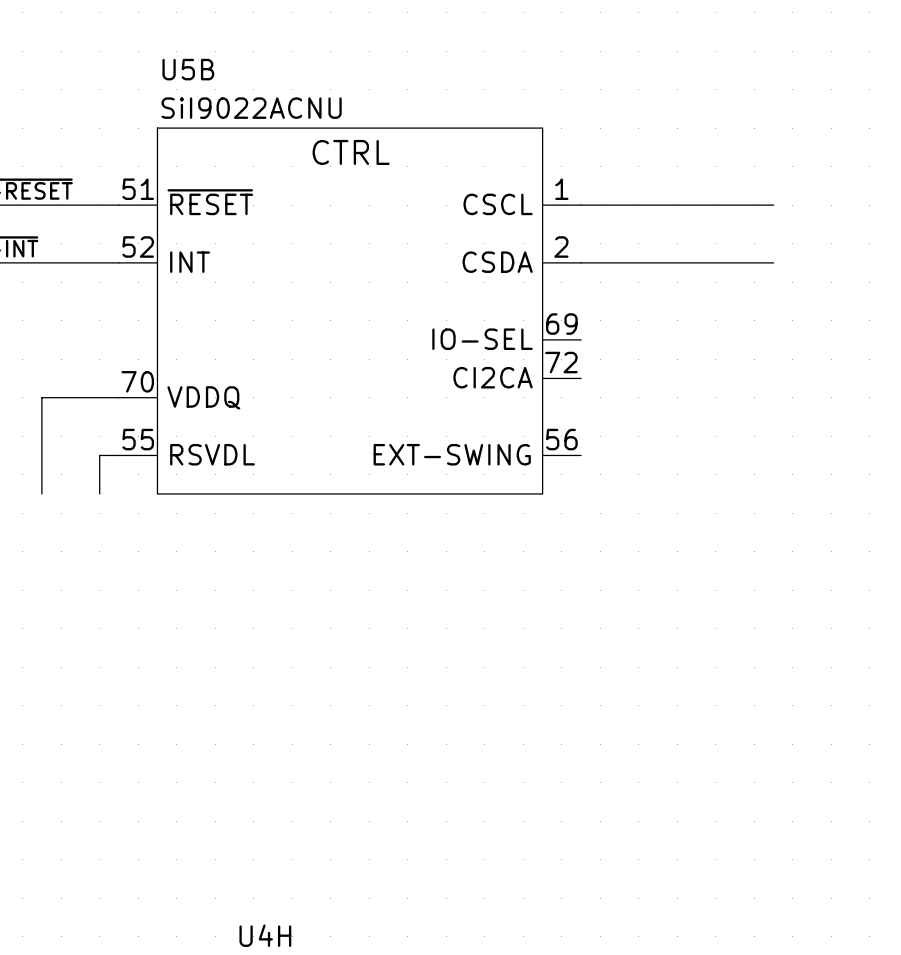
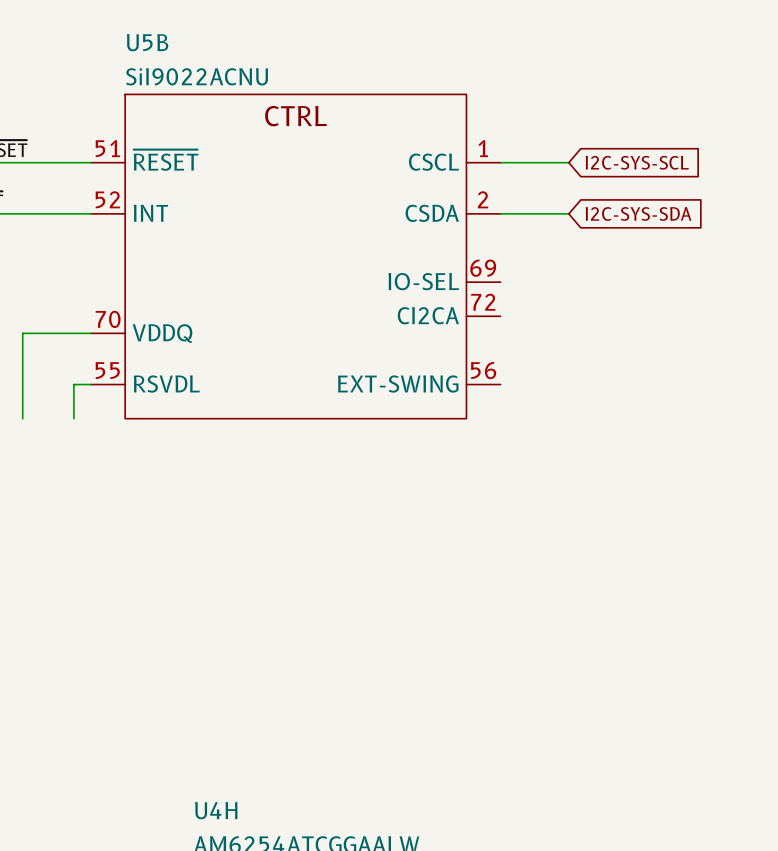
wire: (658, 205) (773, 205) -> none
global label: none -> I2C-SYS-SCL (637, 162)
wire: (658, 262) (773, 262) -> none
global label: none -> I2C-SYS-SDA (638, 213)

